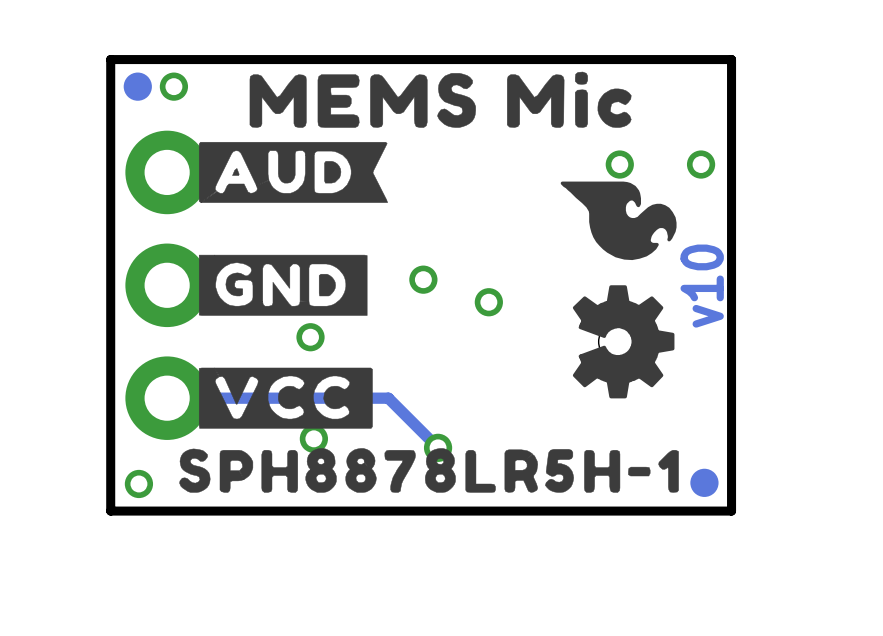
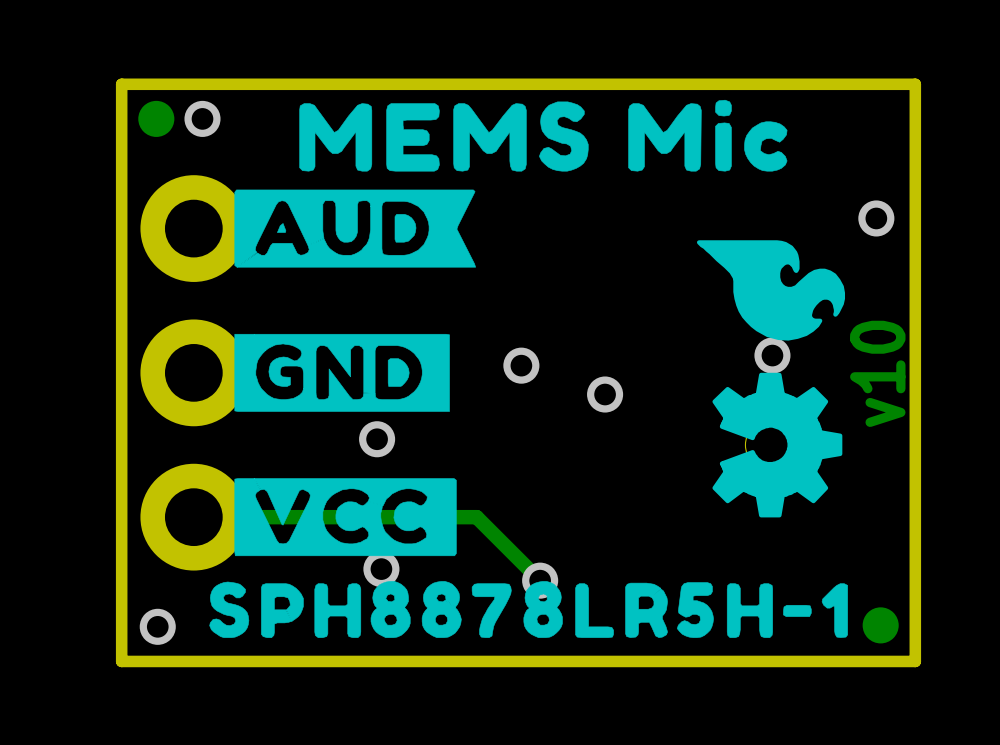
via position: (619, 164) -> (772, 355)

